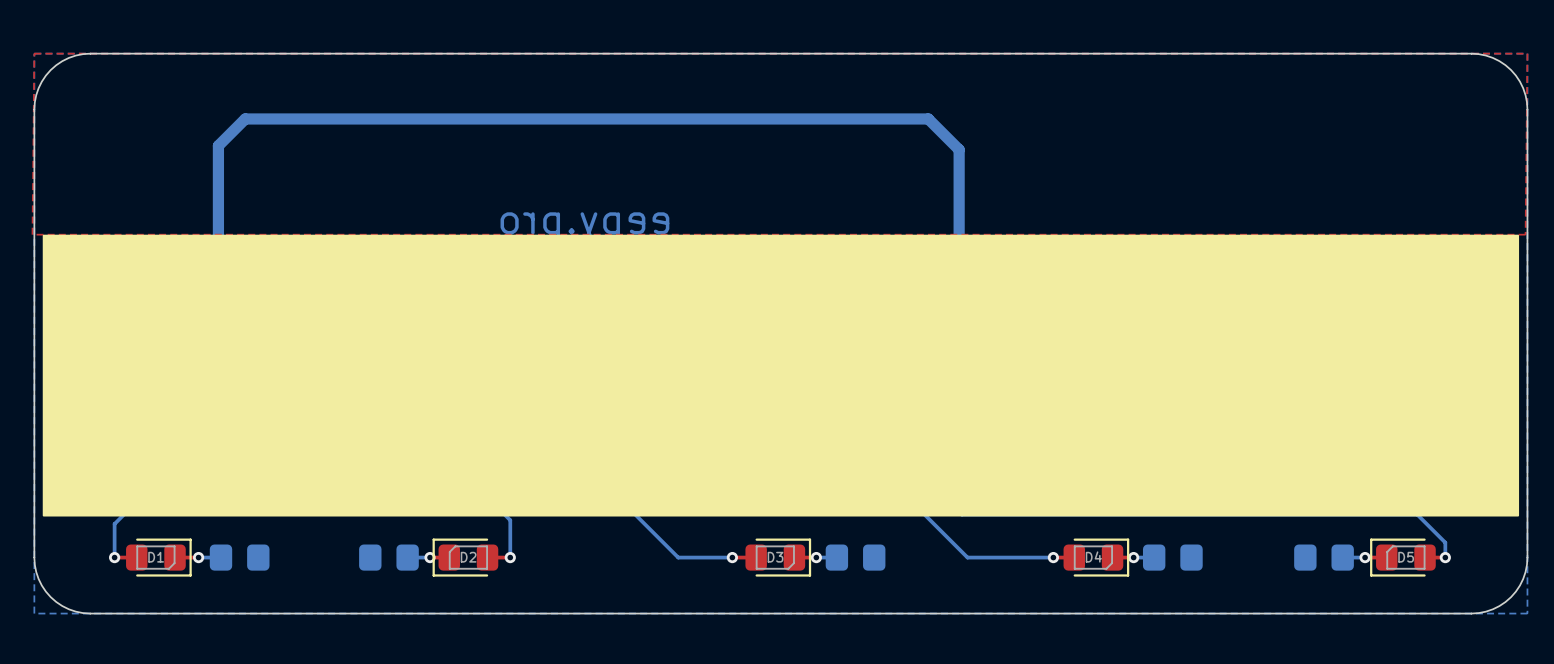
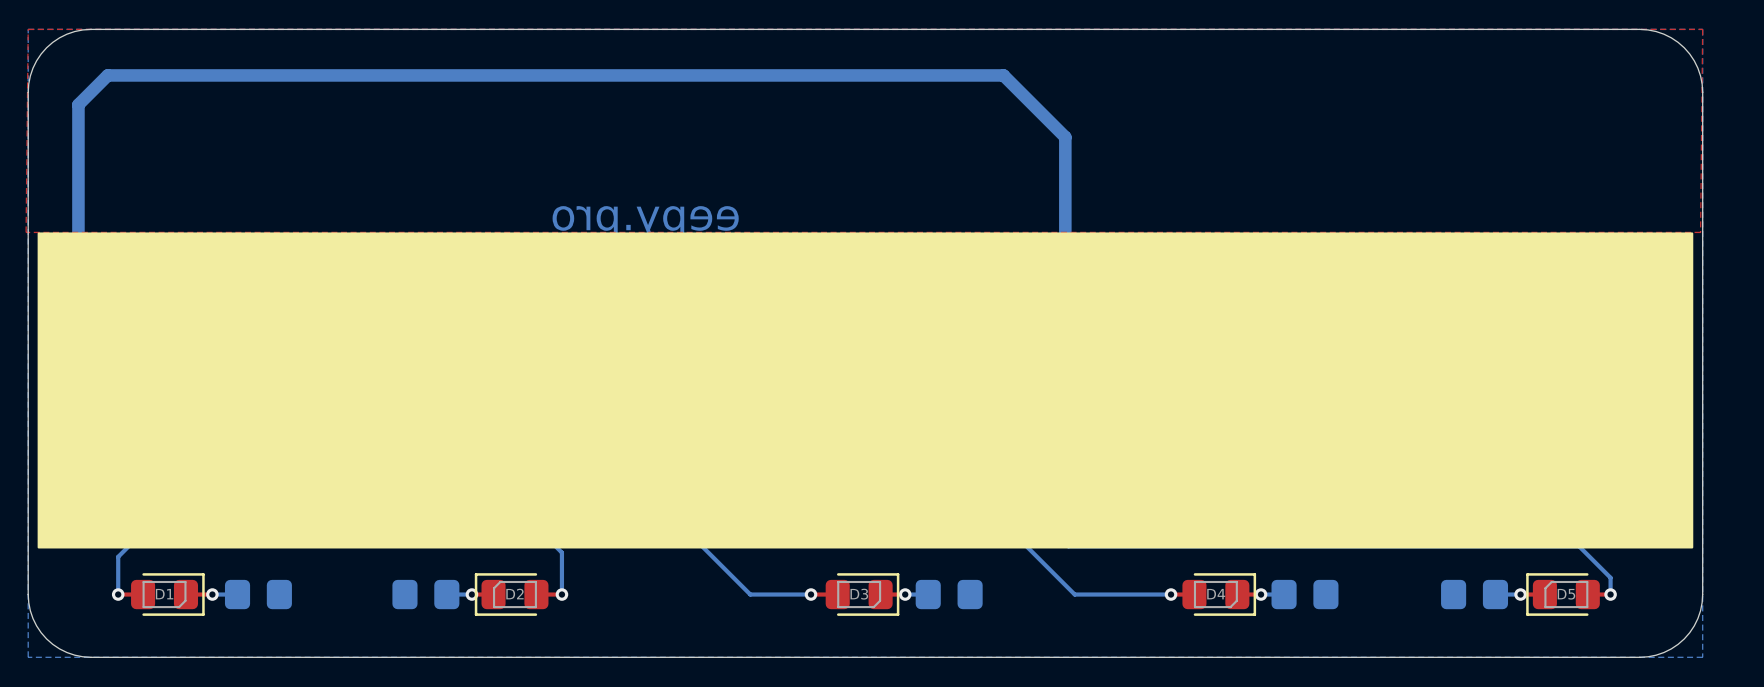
bottom track: (928, 118) (245, 118) (218, 145) (218, 258) -> (1030, 102) (1003, 75) (107, 75) (78, 104) (78, 280) (101, 303) (206, 303)

